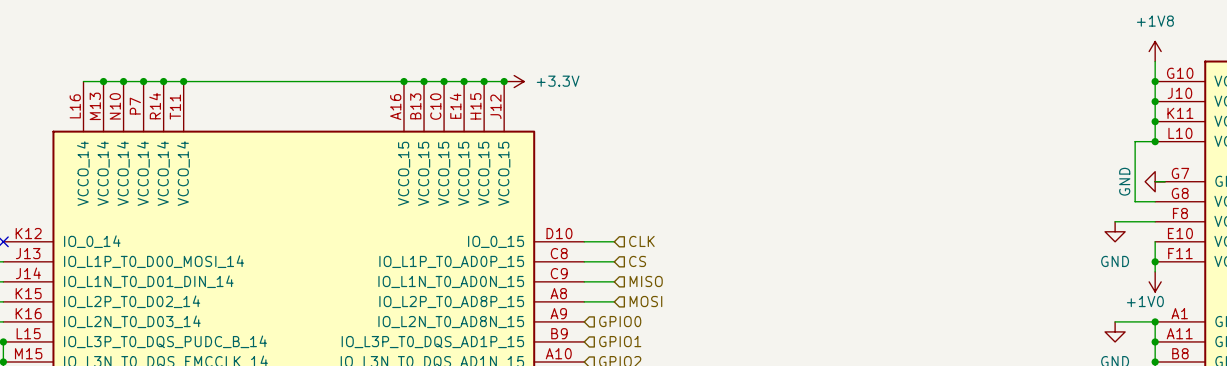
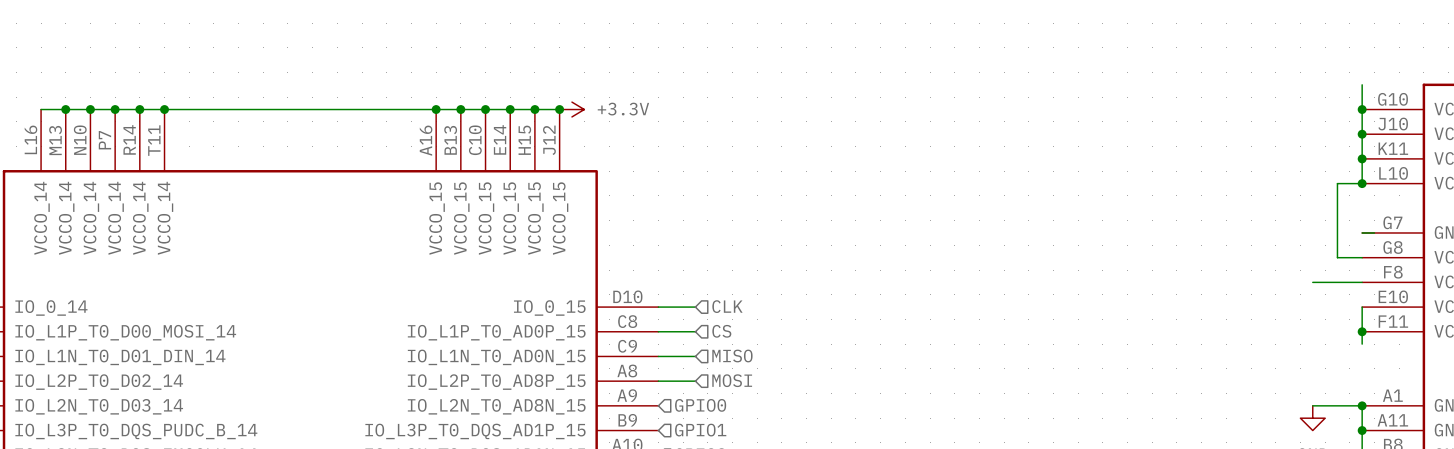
power symbol: +1V8 (1155, 51) -> none
power symbol: GND (1155, 181) -> none
power symbol: GND (1115, 231) -> none
power symbol: +1V0 (1155, 281) -> none

